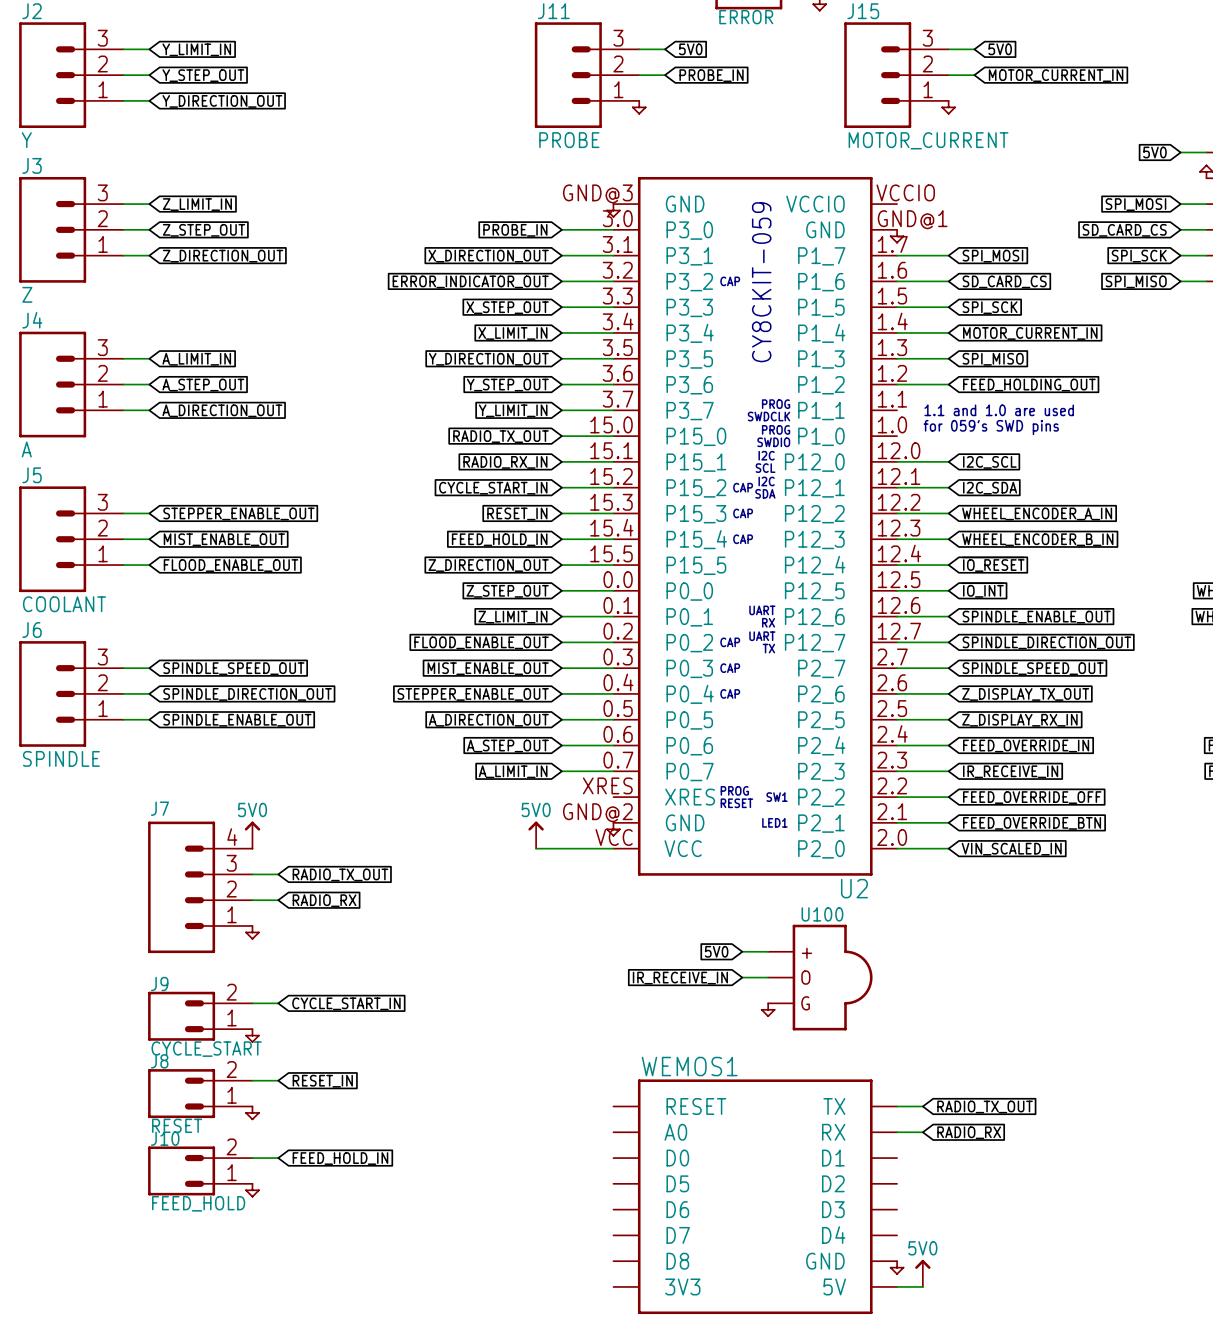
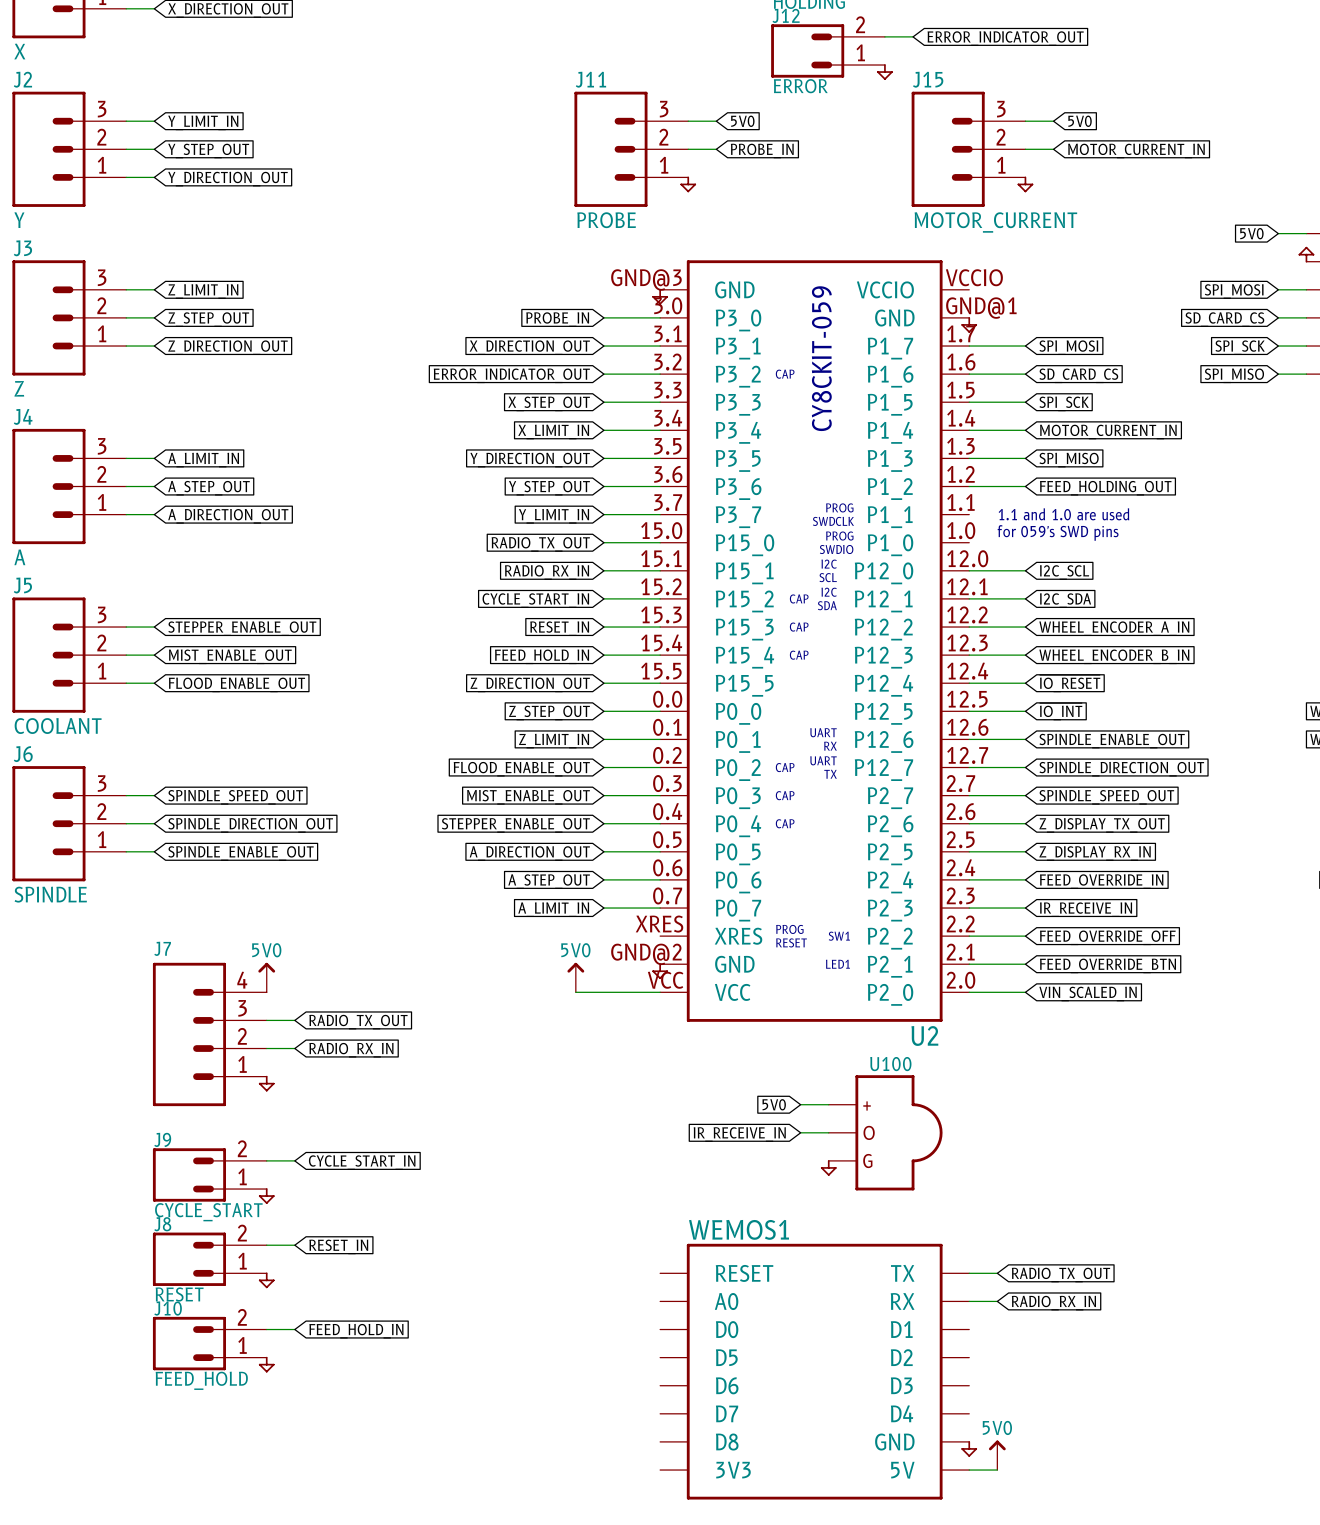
global label: RADIO_RX (324, 900) -> RADIO_RX_IN (351, 1050)
global label: RADIO_RX (969, 1132) -> RADIO_RX_IN (1053, 1303)

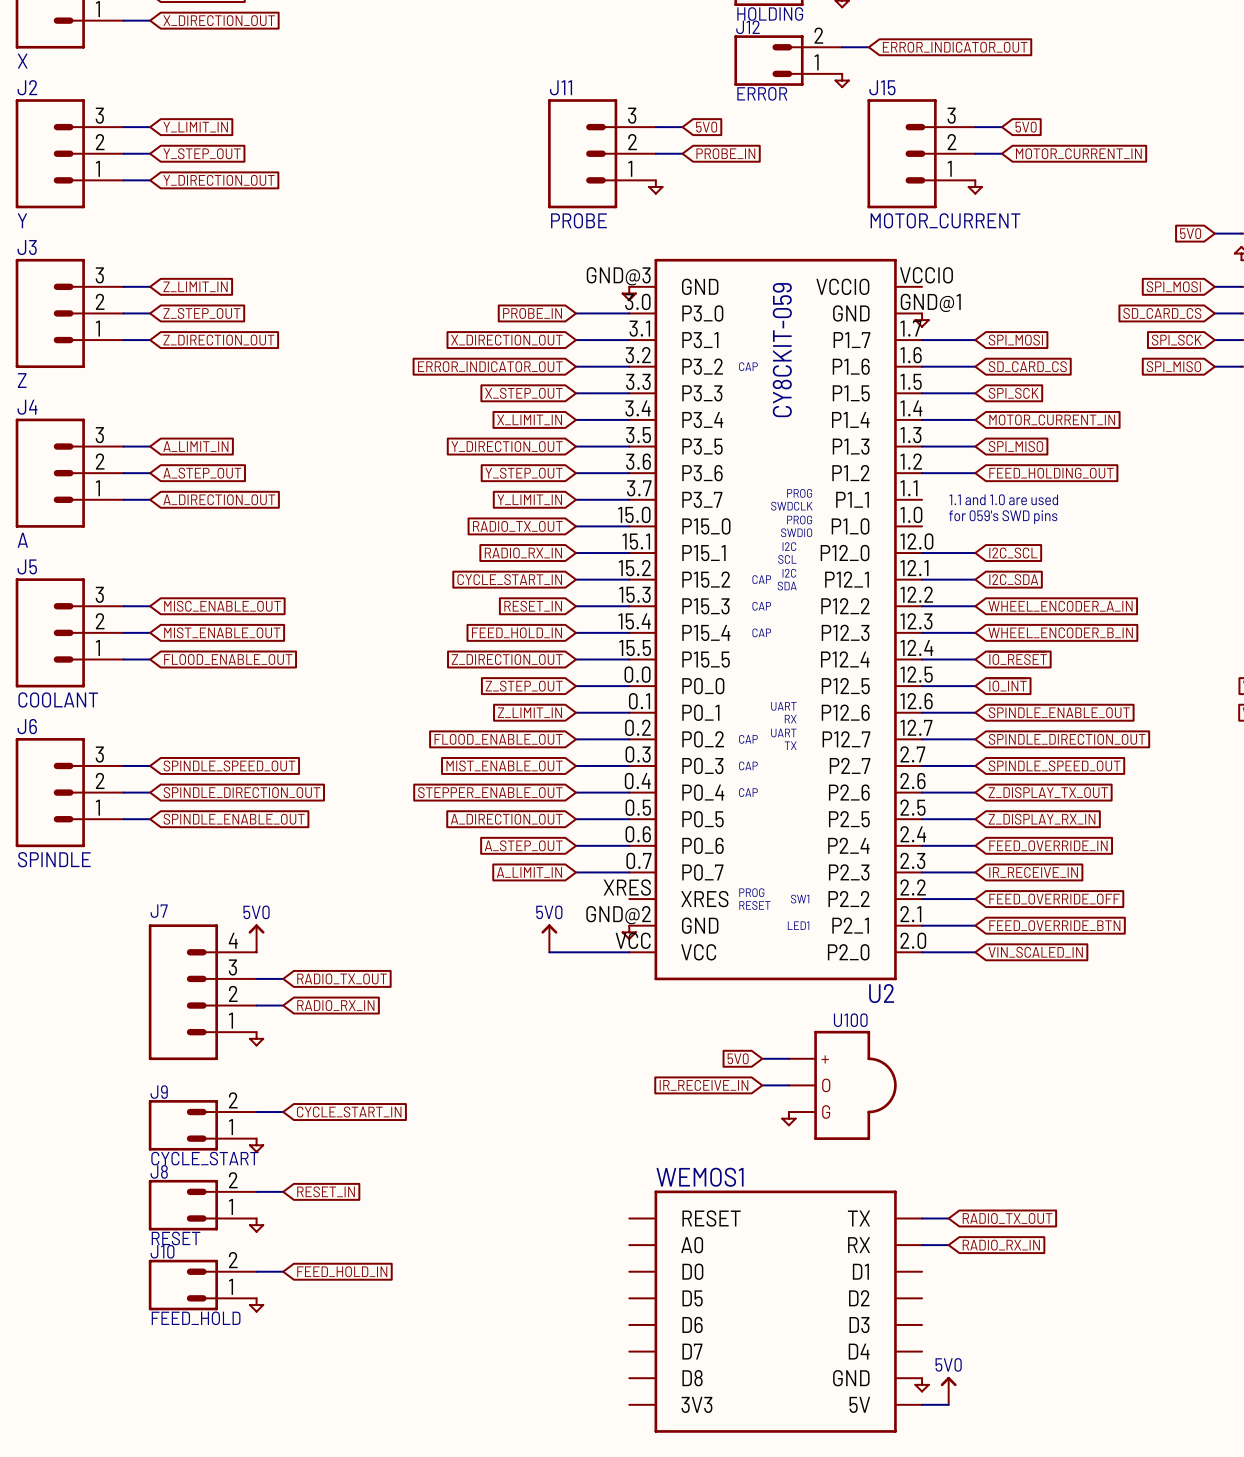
global label: STEPPER_ENABLE_OUT (242, 628) -> MISC_ENABLE_OUT (222, 606)

